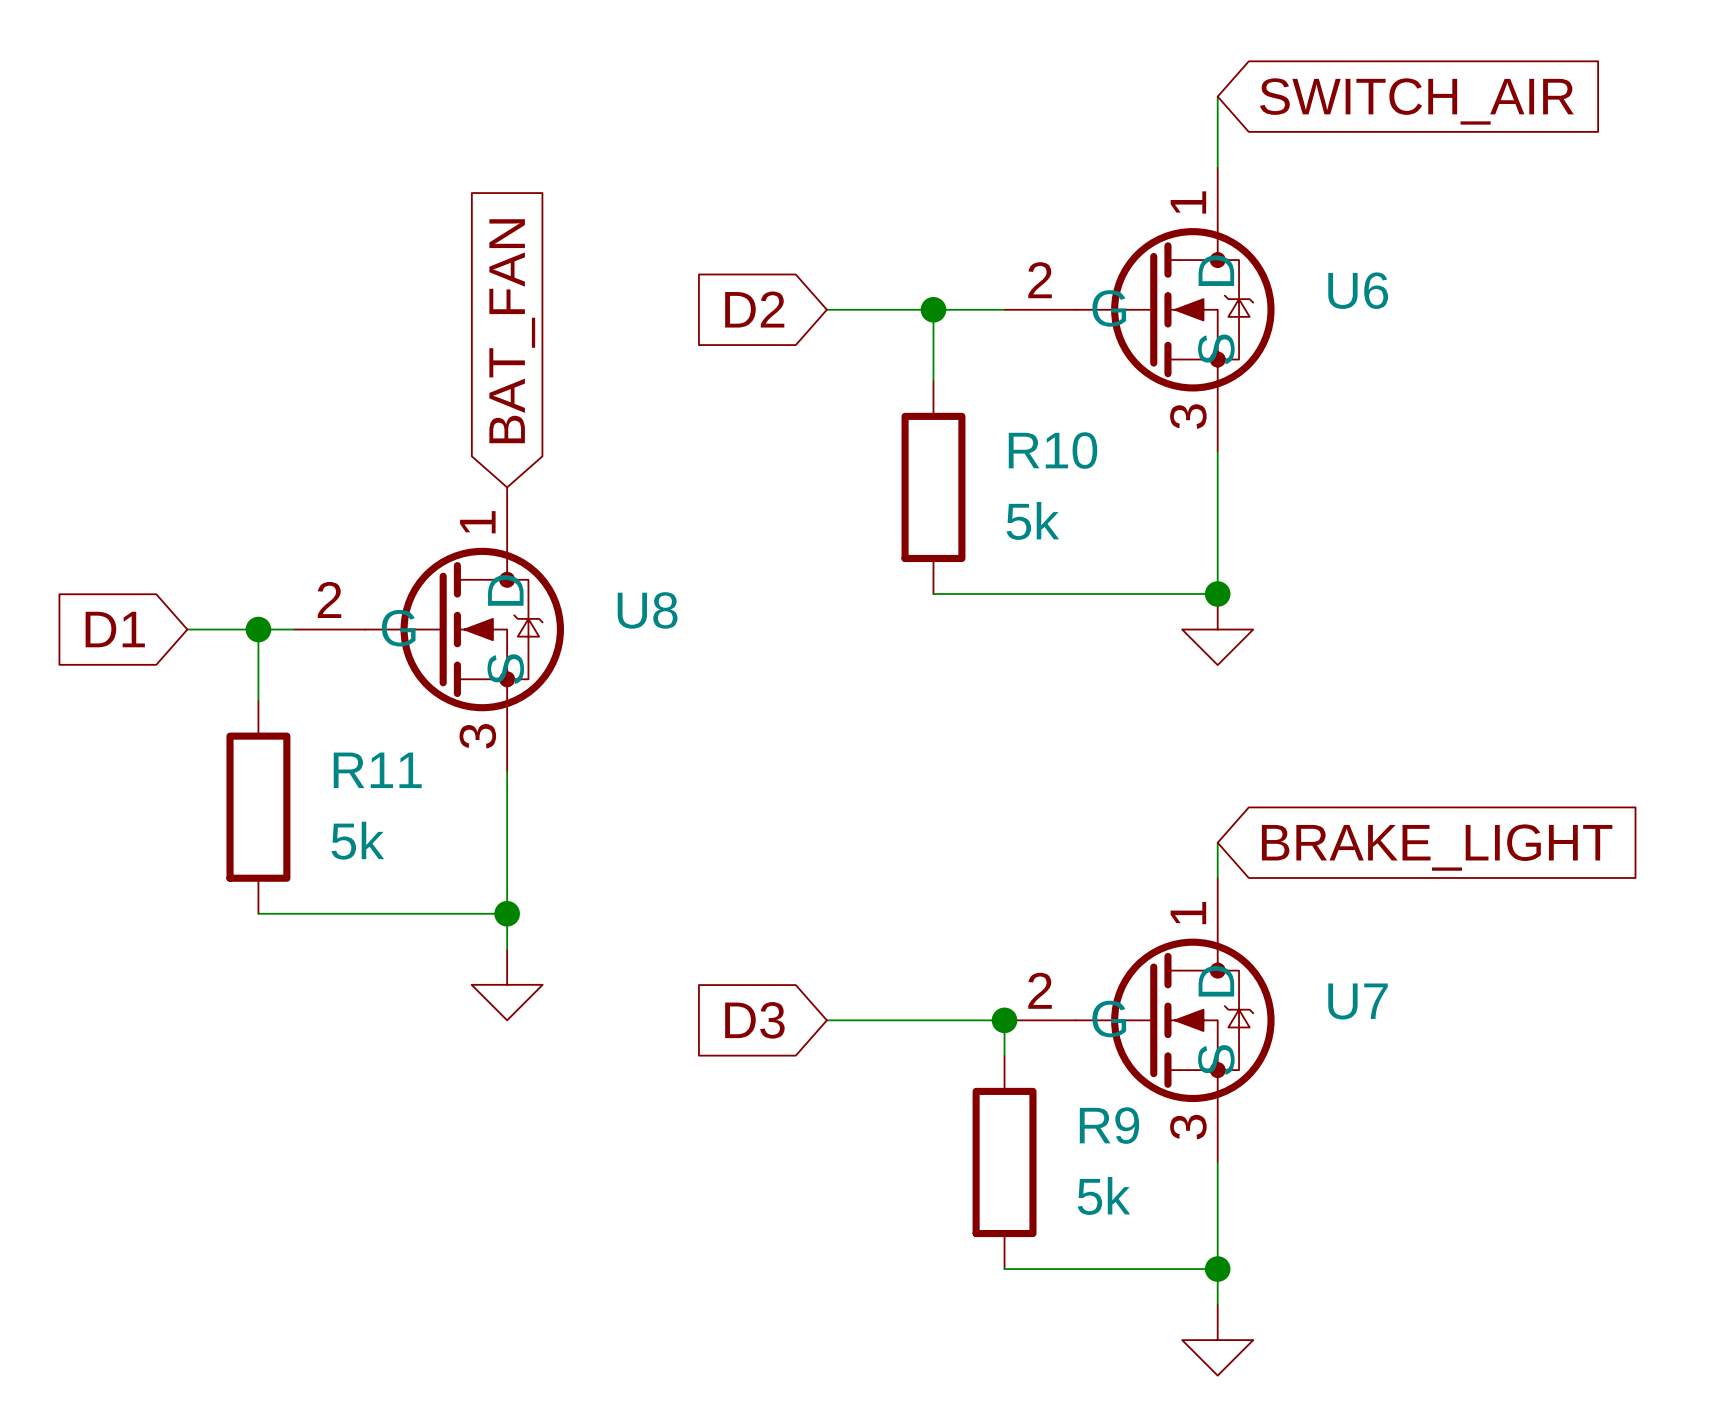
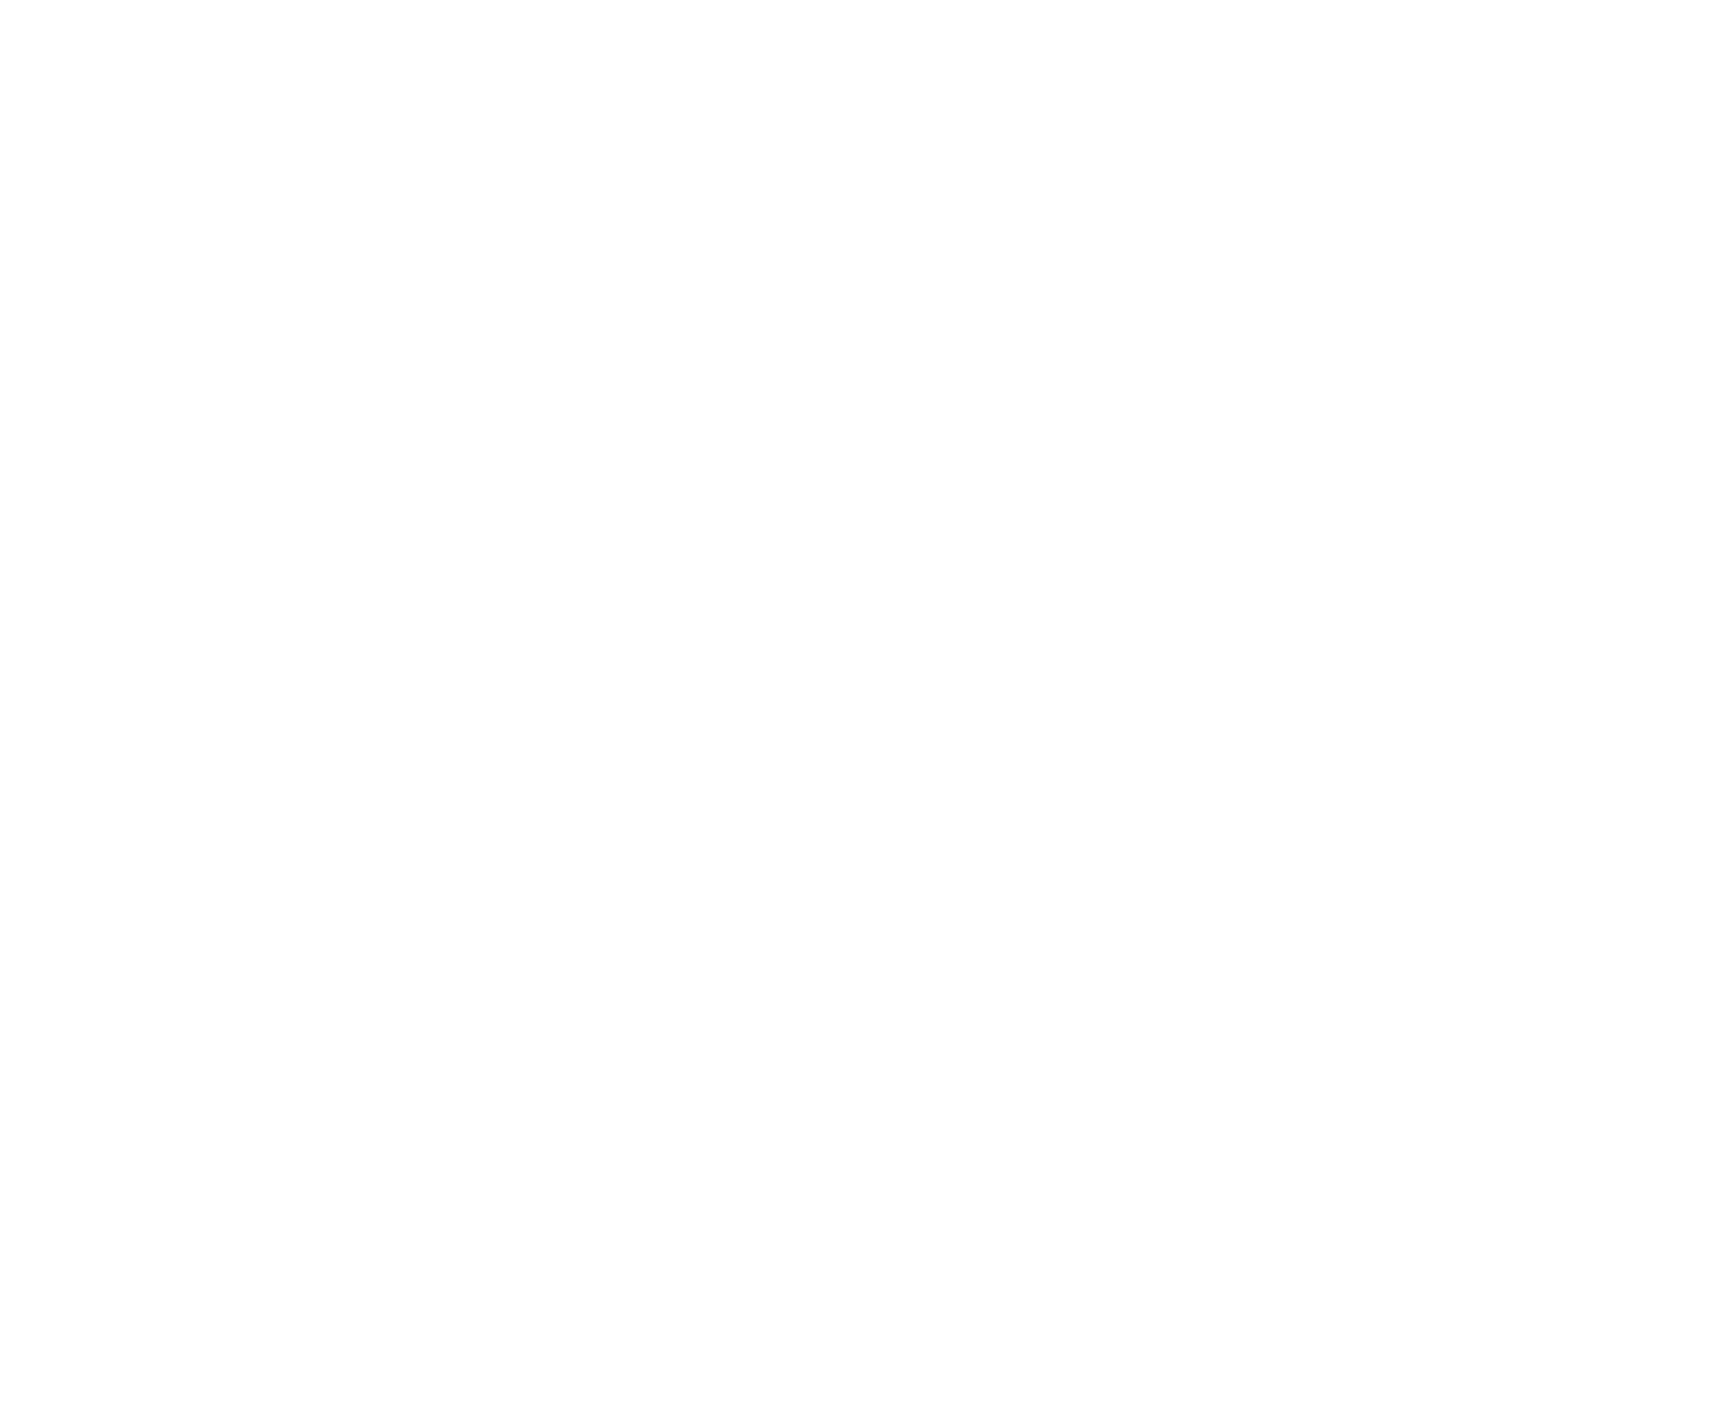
wire: (1217, 96) (1217, 167) -> none
global label: SWITCH_AIR (1416, 101) -> none
global label: D2 (754, 309) -> none
wire: (826, 309) (1004, 309) -> none
wire: (933, 309) (933, 380) -> none
junction: (933, 309) -> none
U6: (1139, 309) -> none
global label: BAT_FAN (512, 331) -> none
wire: (1217, 451) (1217, 594) (933, 594) -> none
R10: 5k (933, 487) -> none
junction: (1217, 594) -> none
global label: D1 (115, 629) -> none
wire: (187, 629) (293, 629) -> none
wire: (258, 629) (258, 700) -> none
junction: (258, 629) -> none
U8: (428, 629) -> none
power symbol: (1217, 629) -> none
wire: (507, 771) (507, 949) -> none
R11: 5k (258, 807) -> none
wire: (1217, 842) (1217, 878) -> none
global label: BRAKE_LIGHT (1437, 847) -> none
wire: (258, 913) (507, 913) -> none
junction: (507, 913) -> none
power symbol: (507, 984) -> none
global label: D3 (754, 1020) -> none
wire: (826, 1020) (1004, 1020) (1004, 1055) -> none
junction: (1004, 1020) -> none
U7: (1139, 1020) -> none
R9: 5k (1004, 1162) -> none
wire: (1217, 1162) (1217, 1304) -> none
wire: (1004, 1269) (1217, 1269) -> none
junction: (1217, 1269) -> none
power symbol: (1217, 1340) -> none

